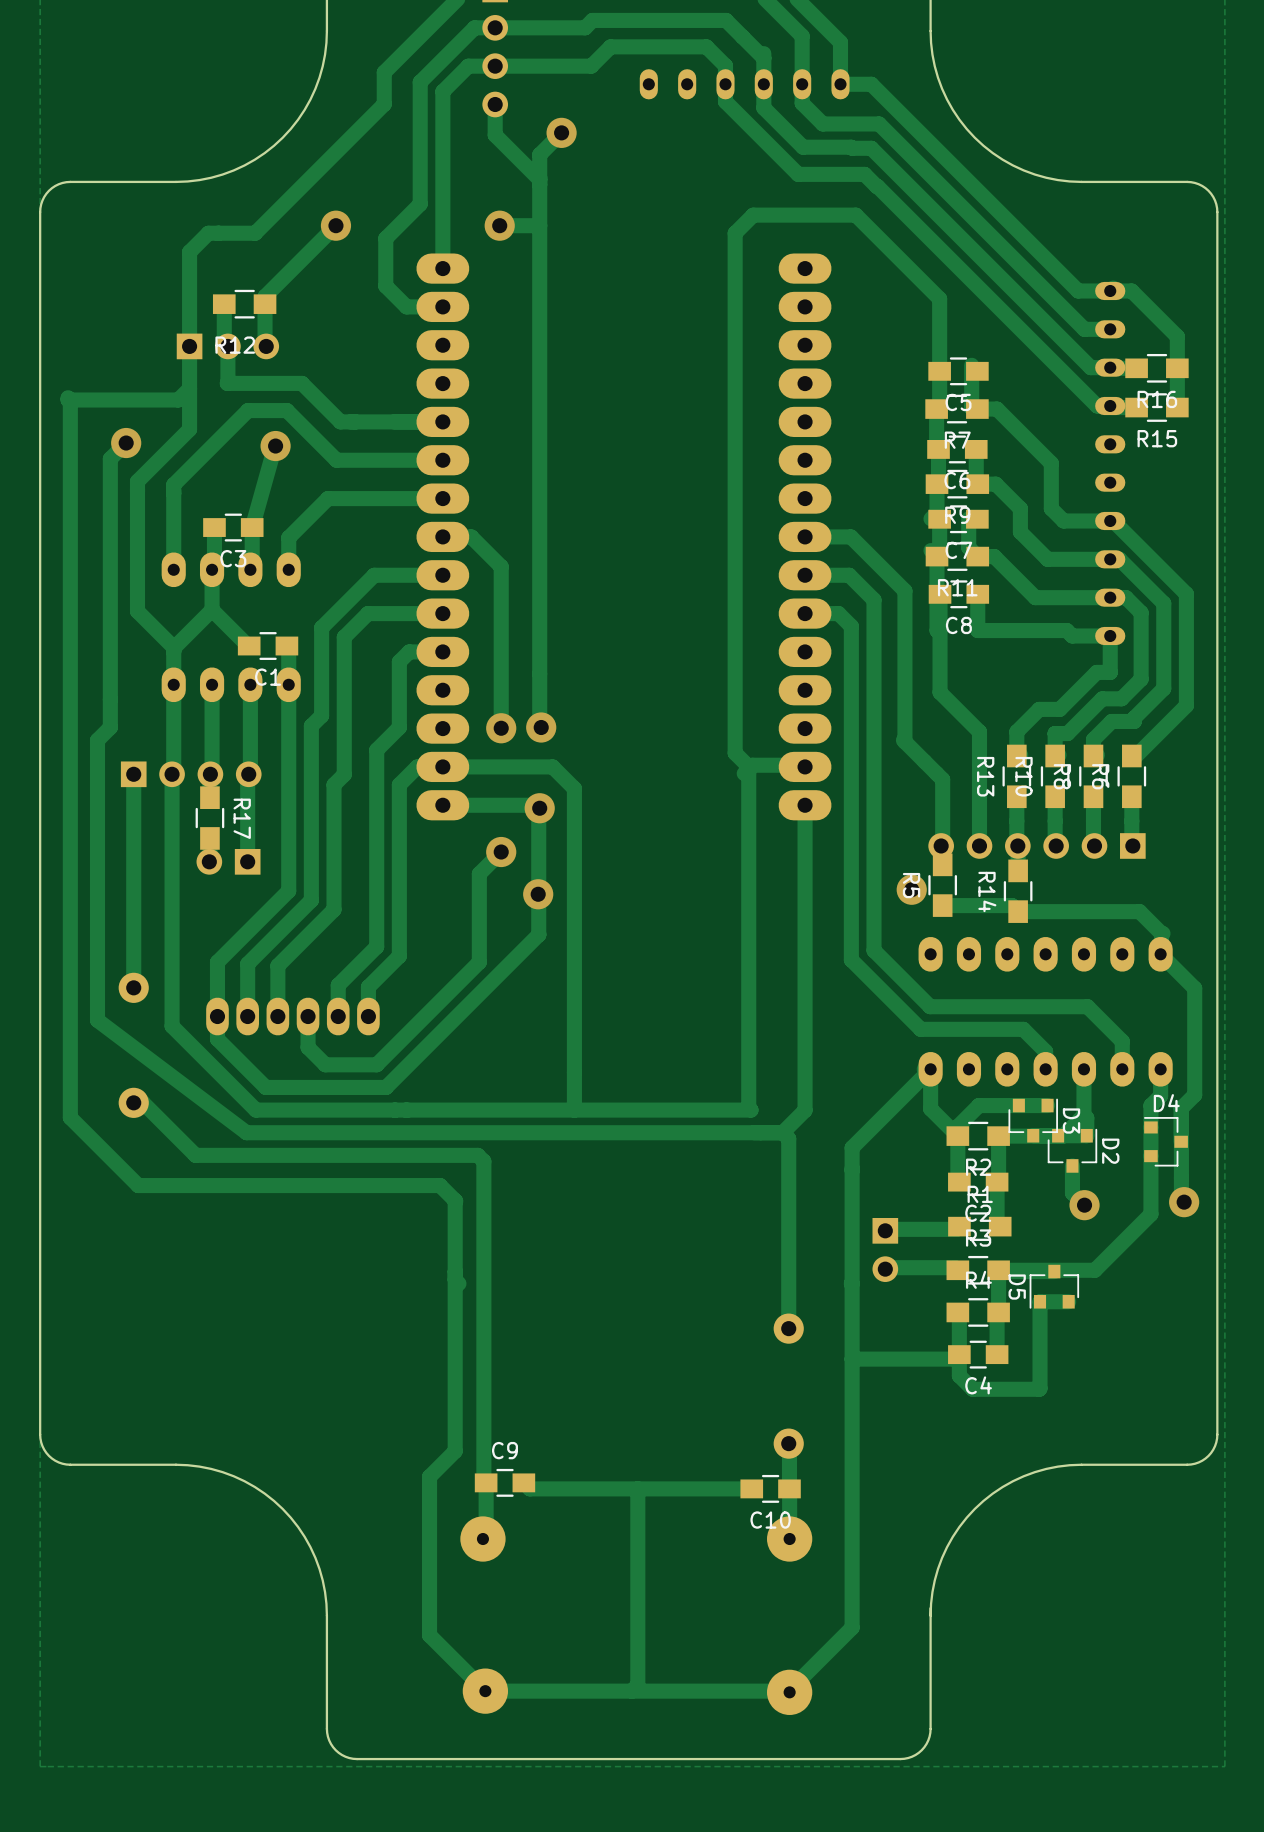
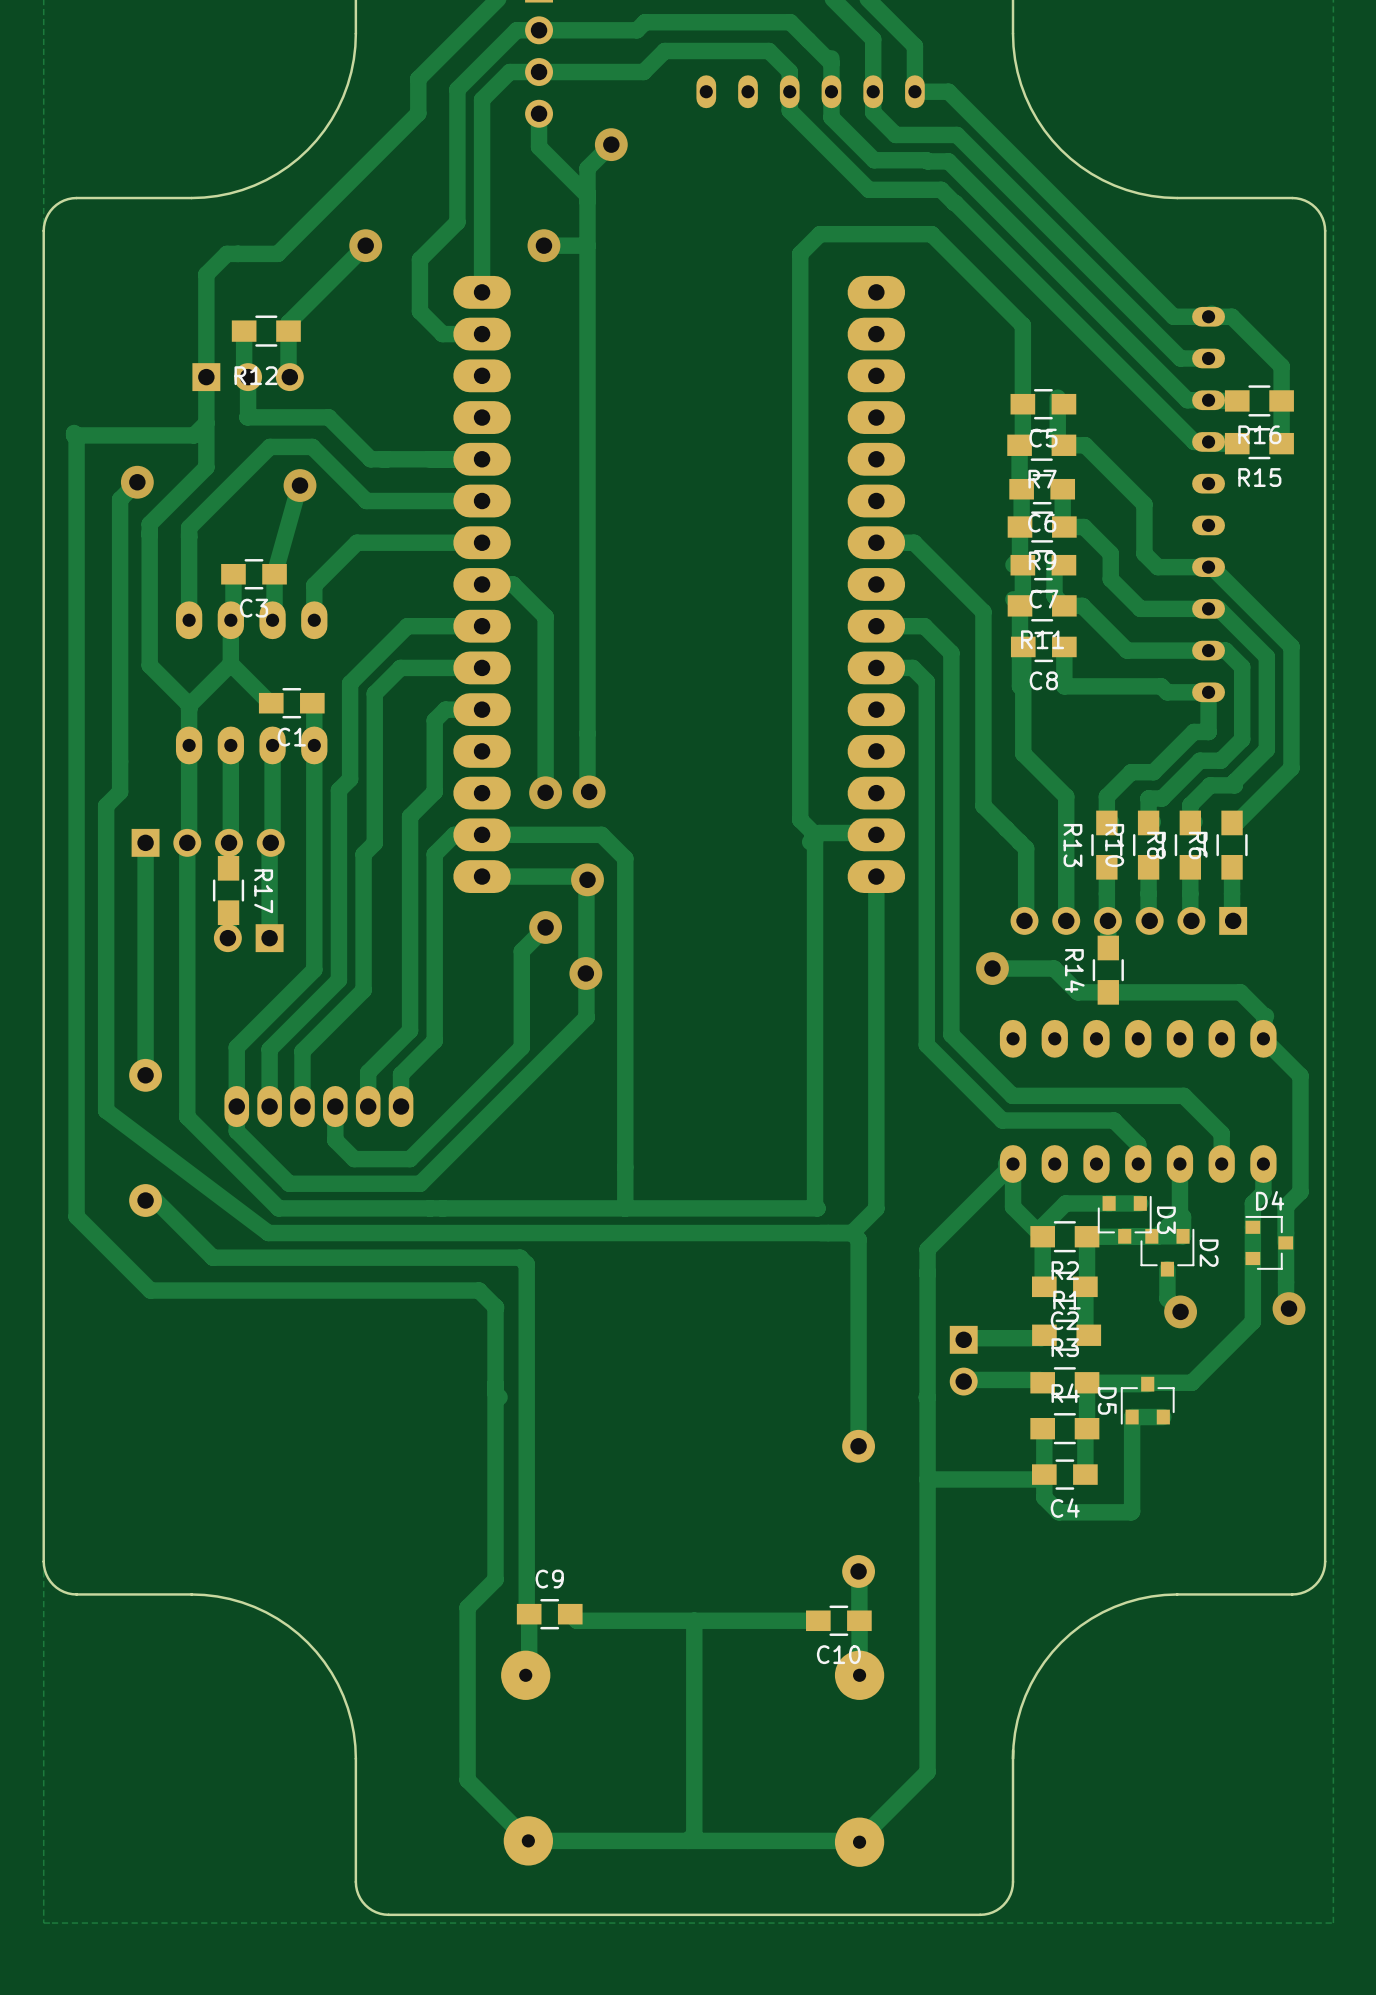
track: none -> (876, 542) (914, 542) (983, 612) (983, 805)
track: (805, 536) (850, 536) (904, 590) (904, 741) -> none
R5: (942, 885) -> none
track: (942, 905) (1012, 905) (1018, 911) -> (992, 968) (1054, 968) (1077, 992) (1108, 992)

